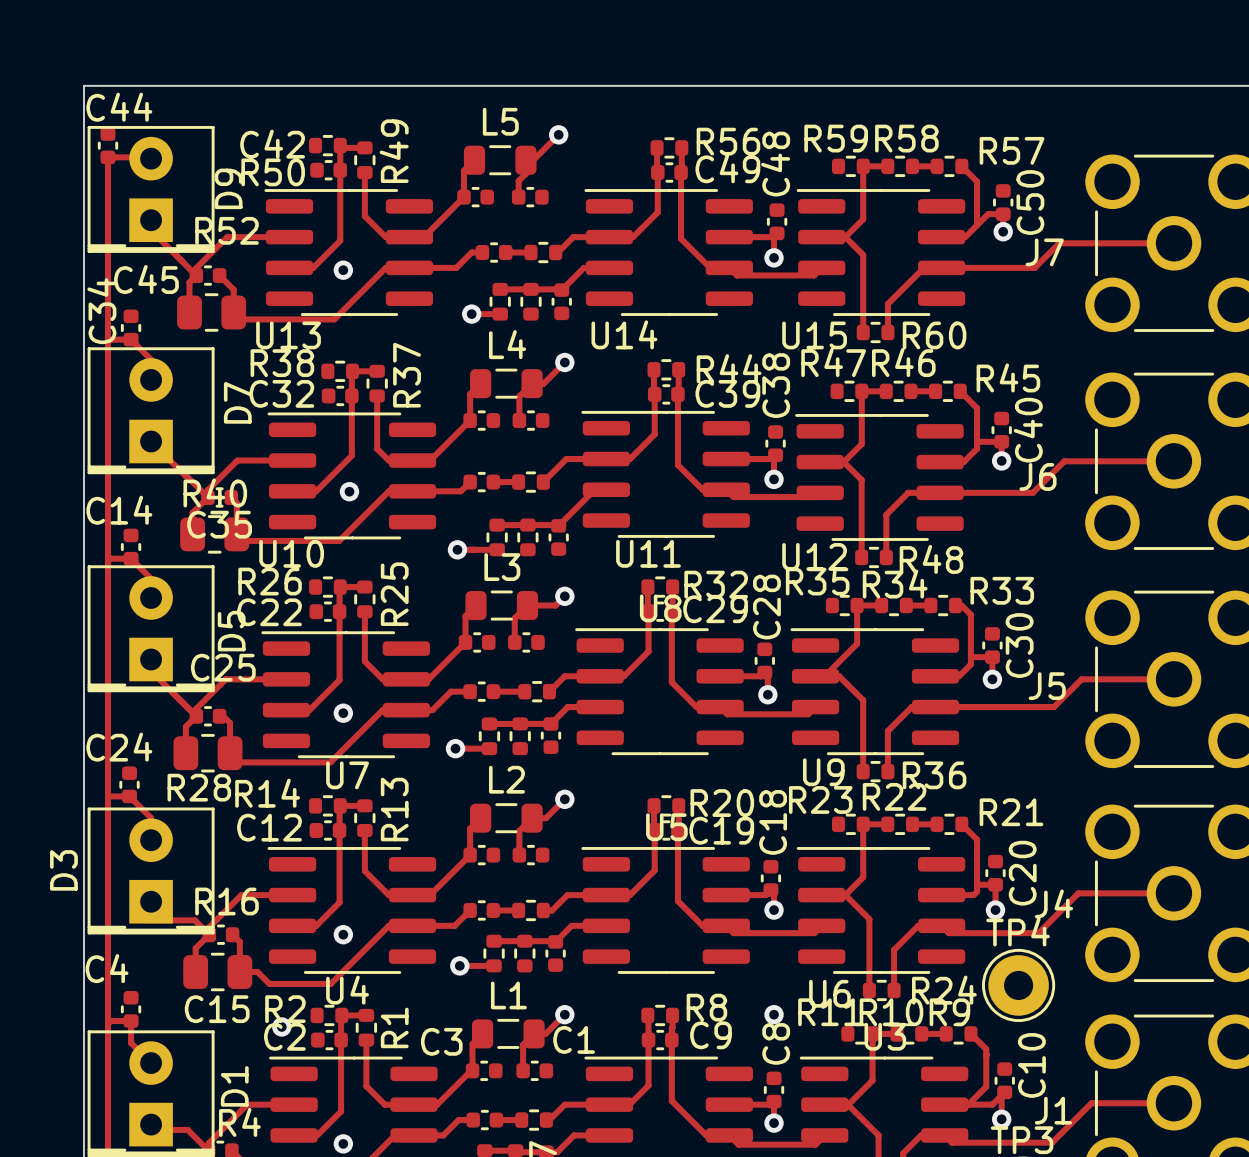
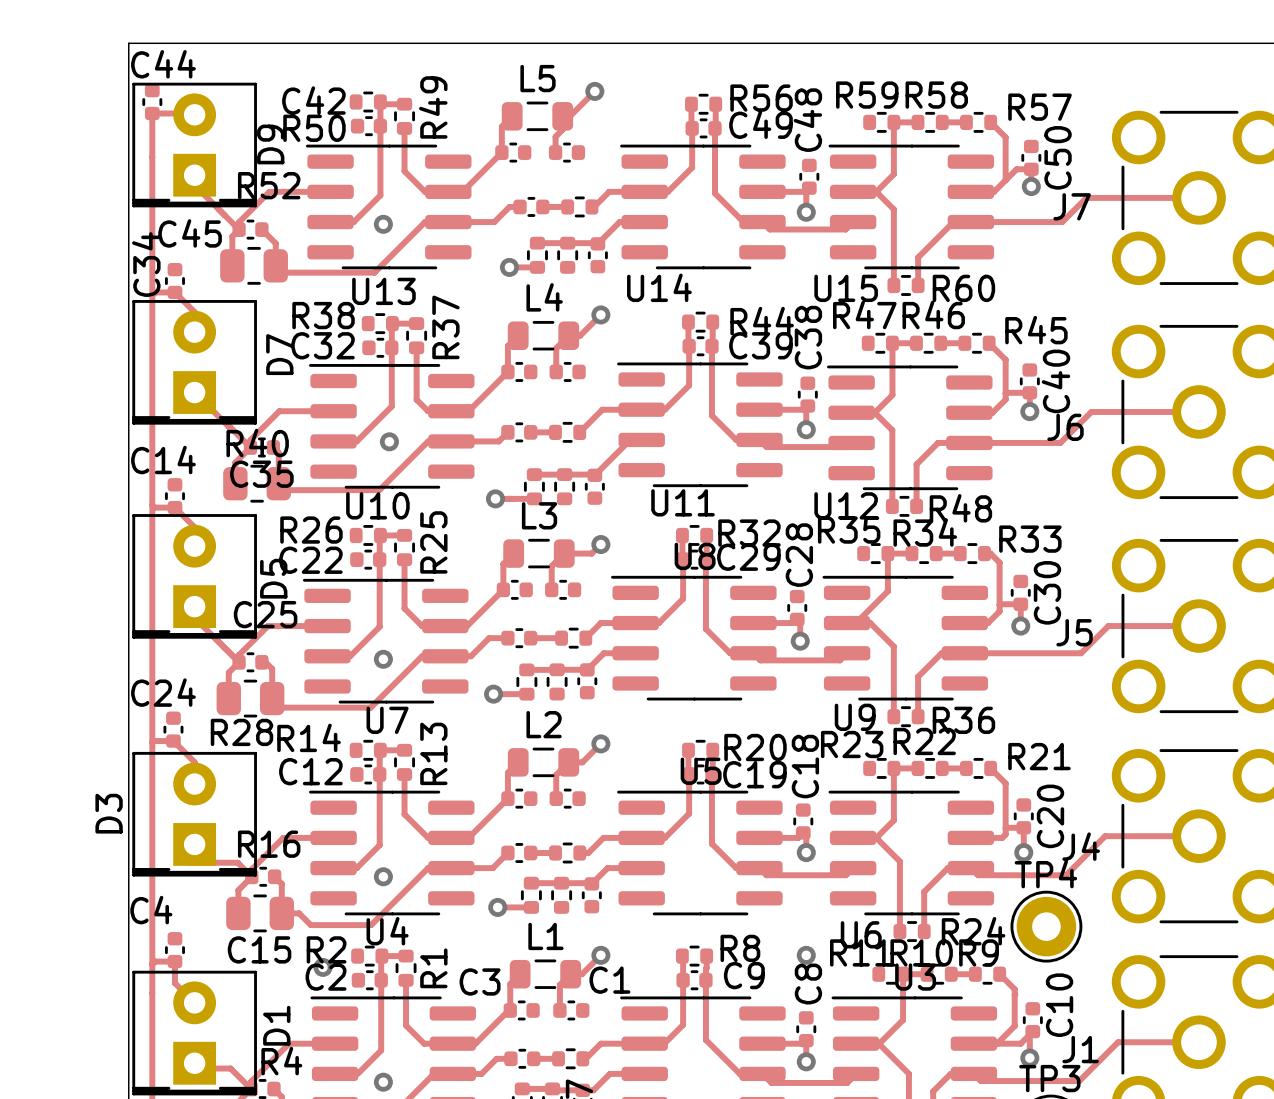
U13 name position: U13 (288, 335) -> U13 (383, 291)
U10 name position: U10 (291, 553) -> U10 (377, 505)

